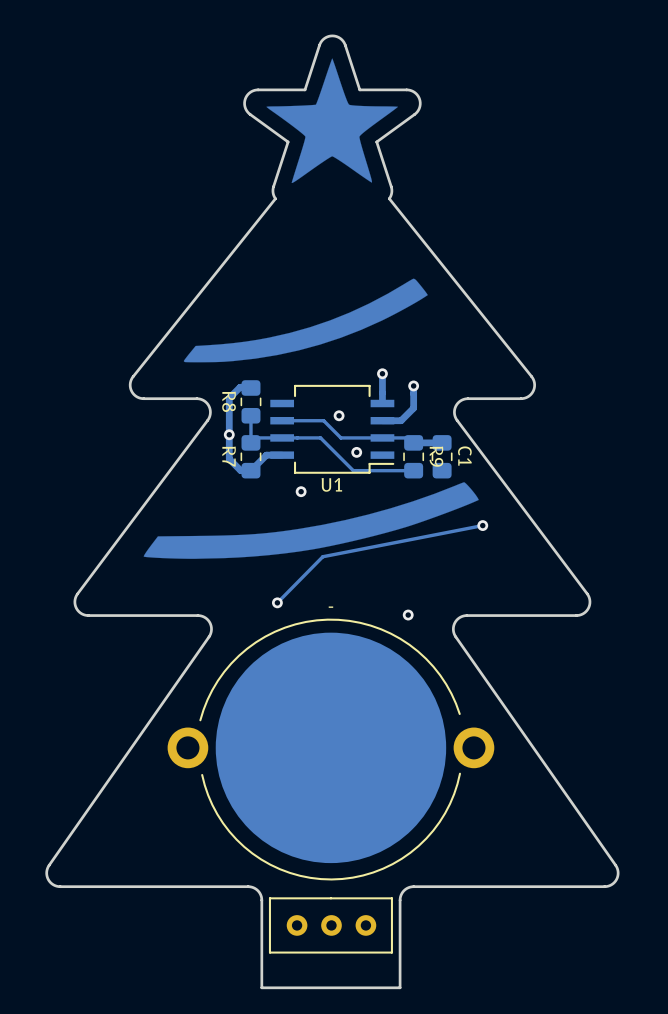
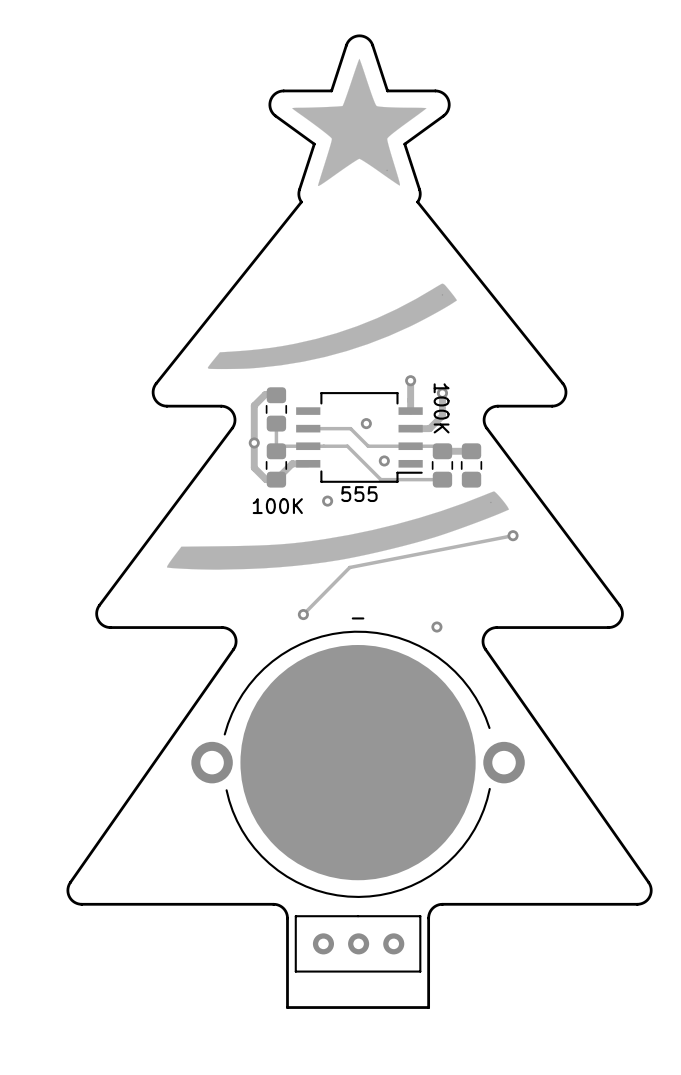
R8 name: R8 (229, 401) -> 100K (277, 506)
R7 name: R7 (229, 456) -> none
R9 name: R9 (436, 456) -> 100K (441, 408)
C1 name: C1 (464, 456) -> none
U1 name: U1 (331, 484) -> 555 (359, 494)

